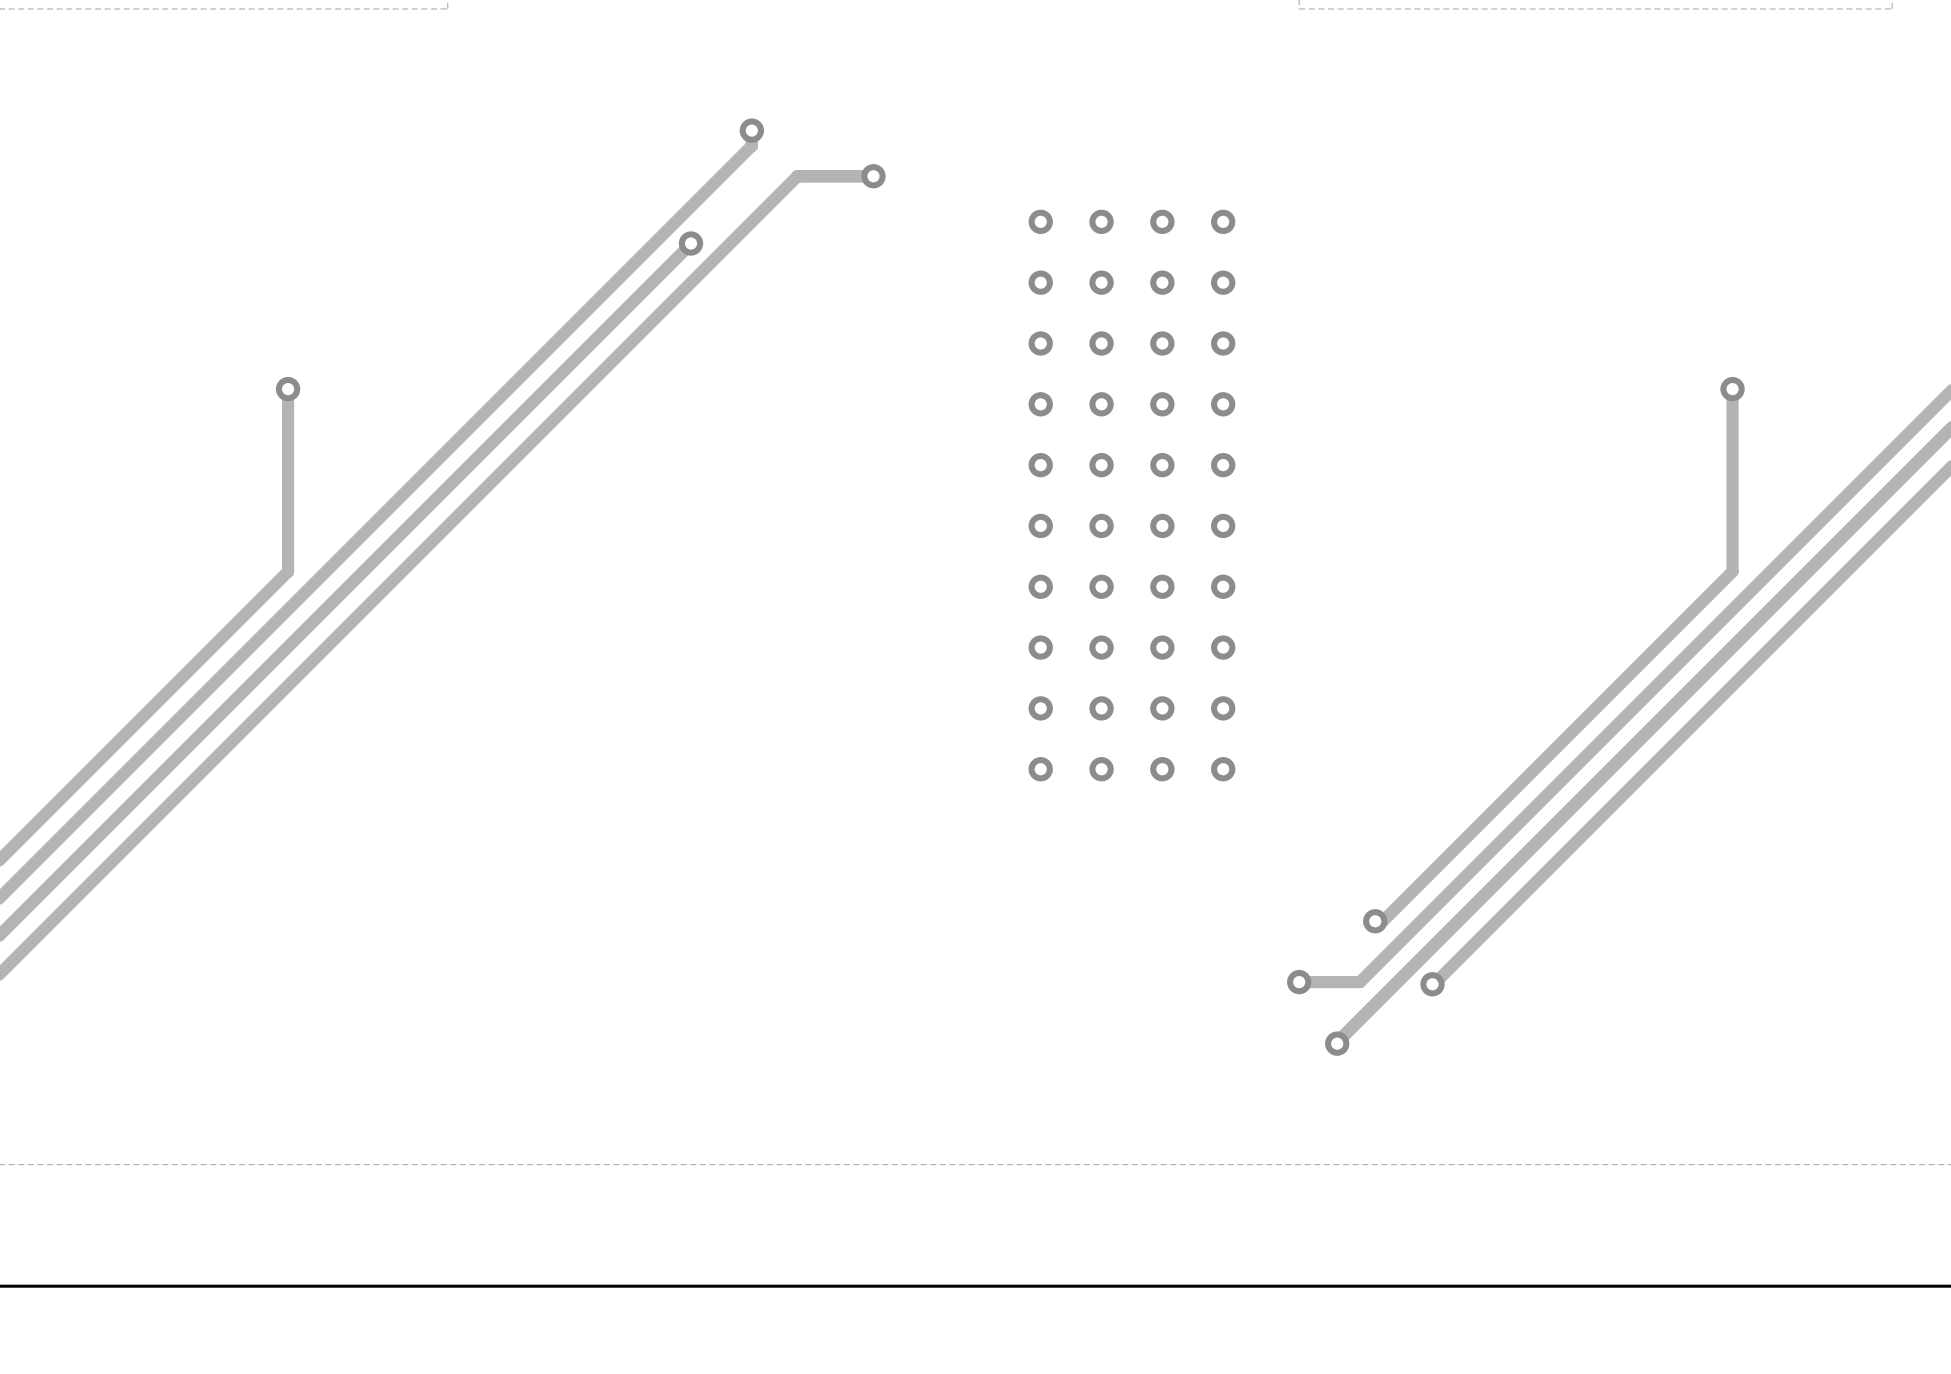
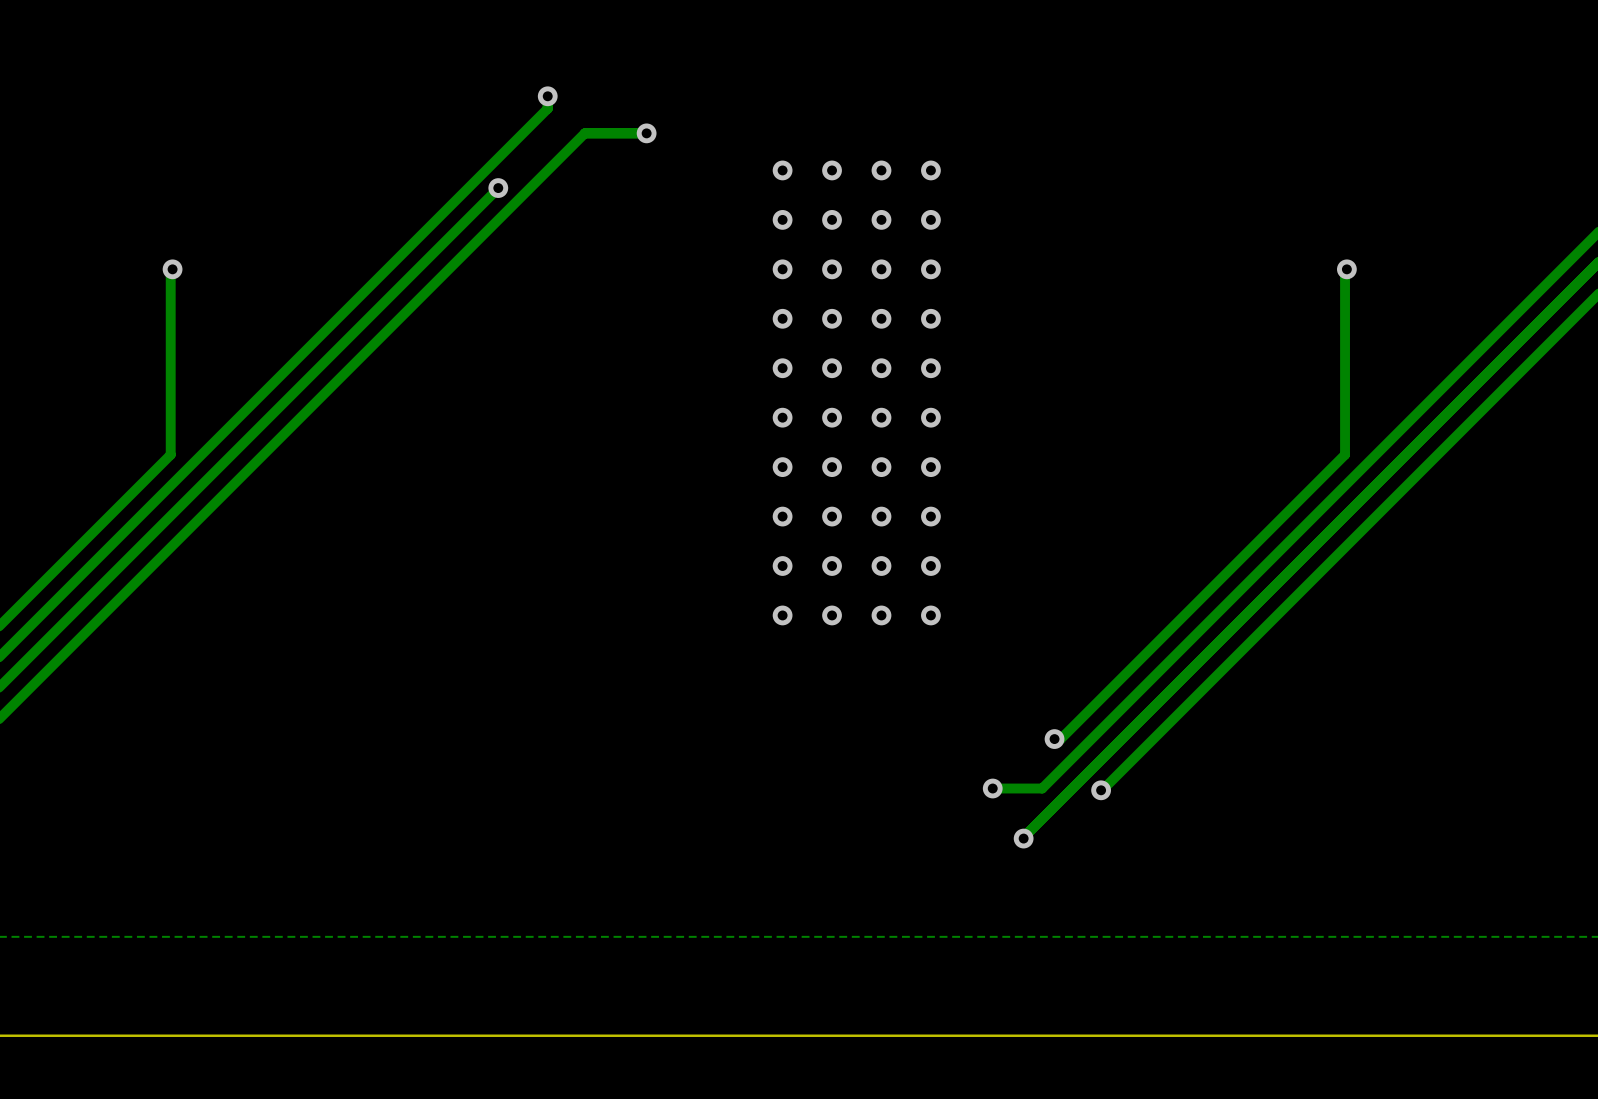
track: none -> (172, 269) (170, 271) (170, 306)
track: none -> (1346, 269) (1345, 271) (1345, 306)
via position: (288, 389) -> (172, 269)
via position: (1732, 389) -> (1346, 269)

